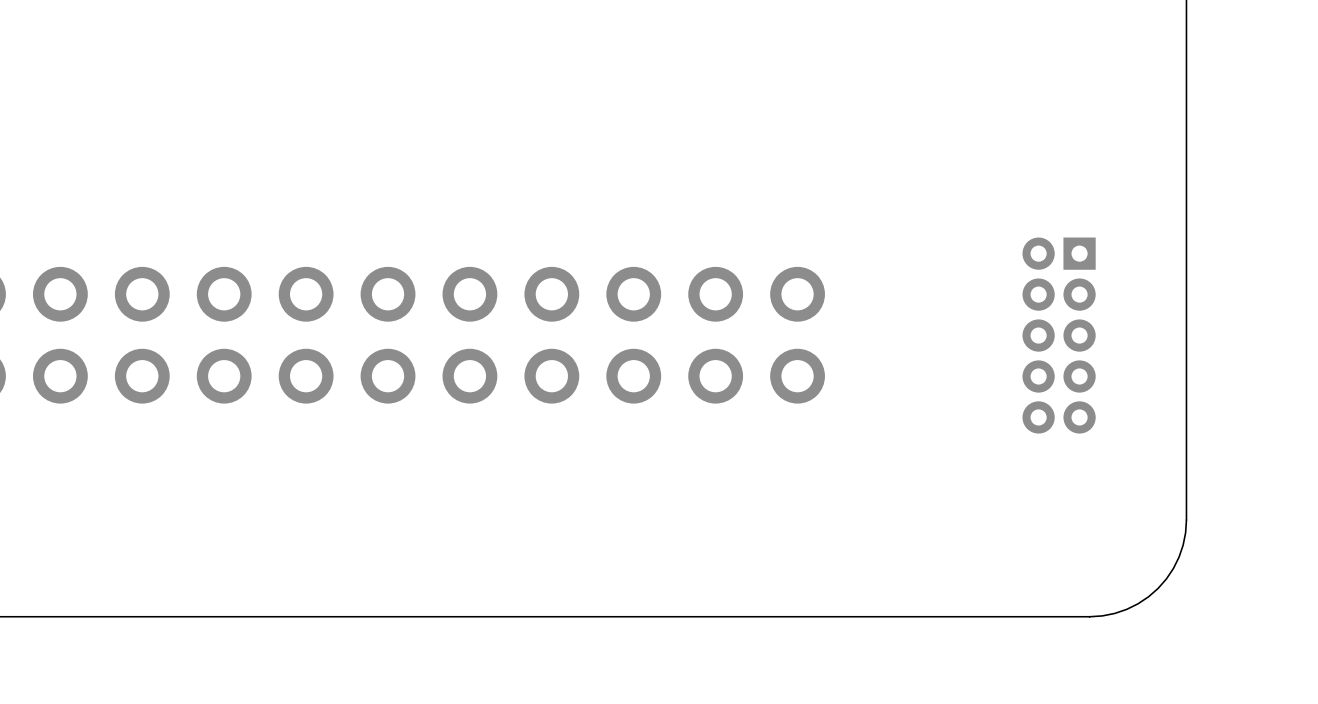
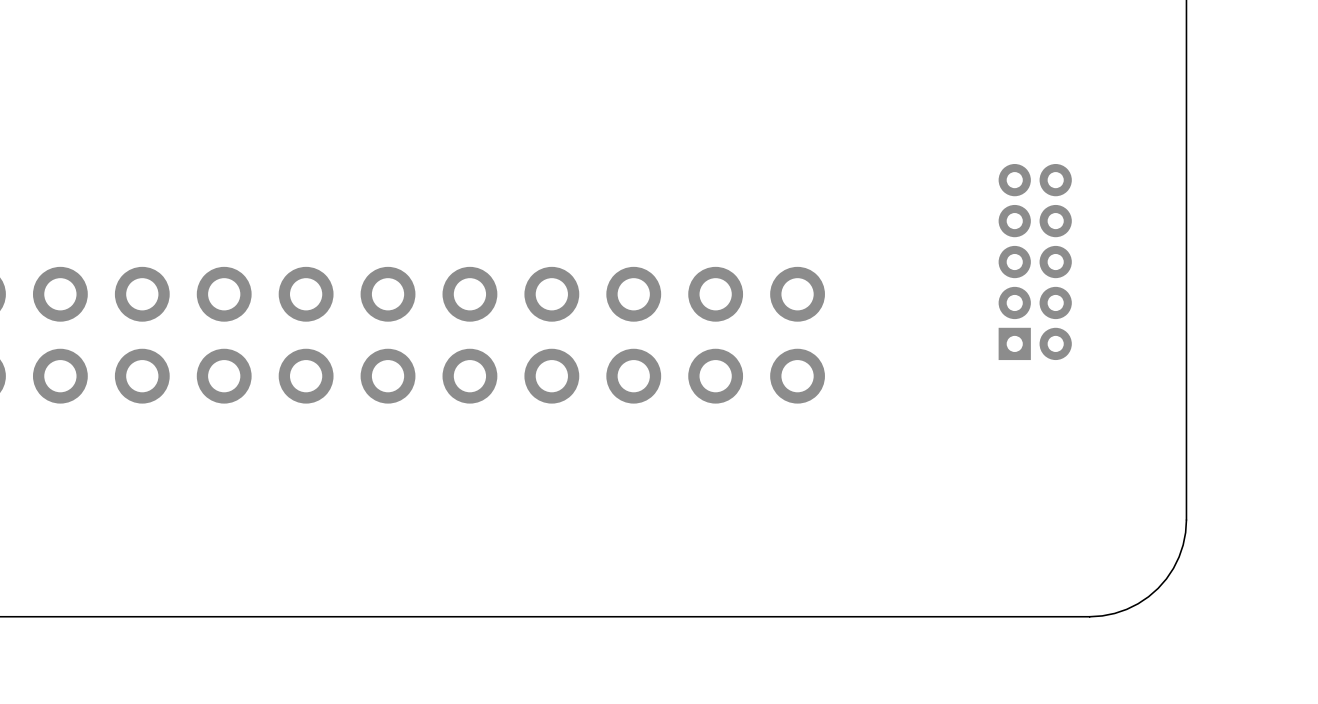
part rotation: 0° (1059, 335) -> 180° (1035, 262)

